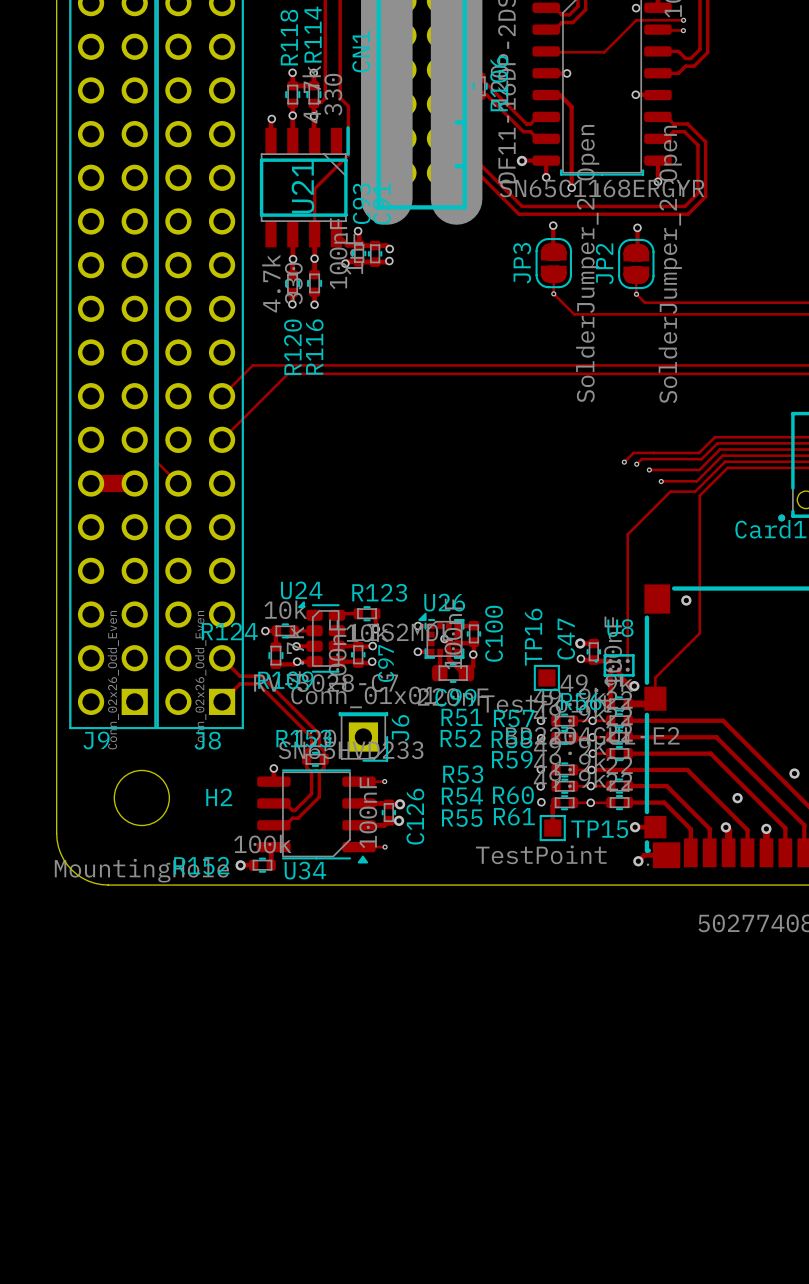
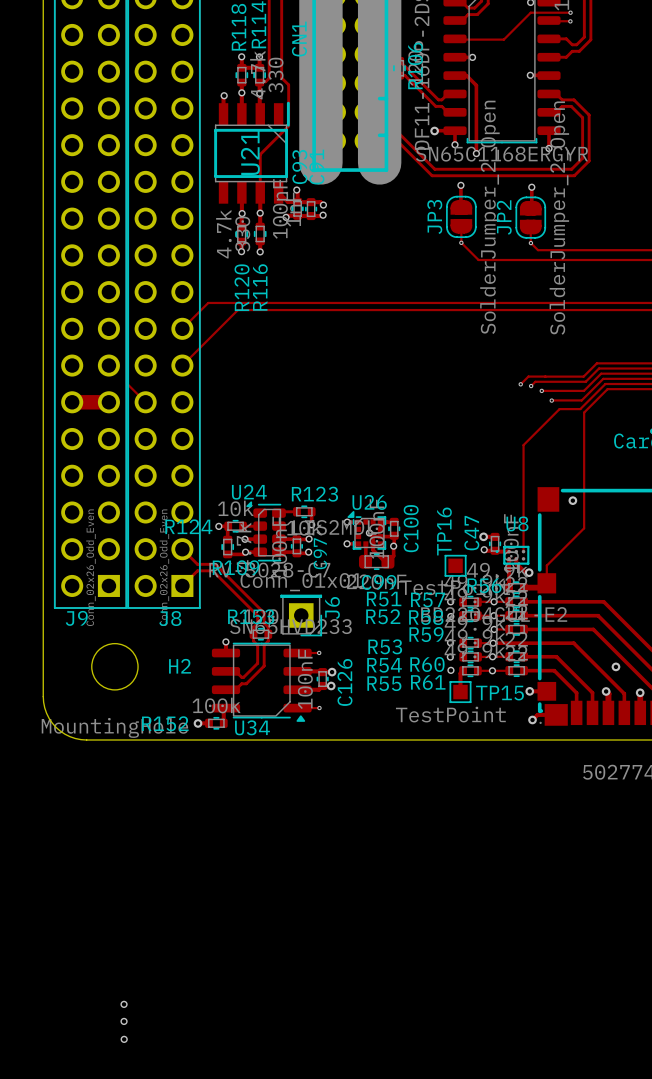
via: none -> (124, 1004)
via: none -> (124, 1021)
via: none -> (124, 1039)

